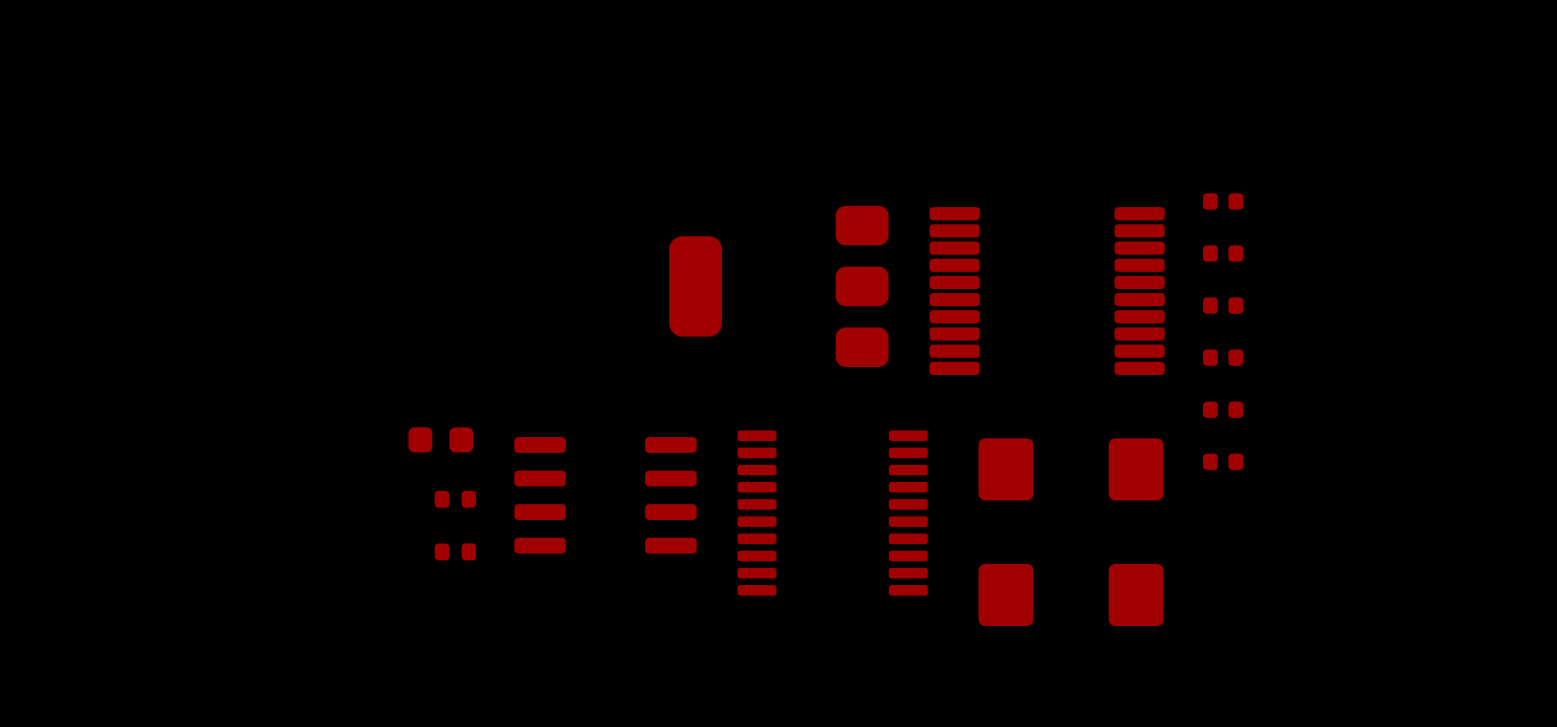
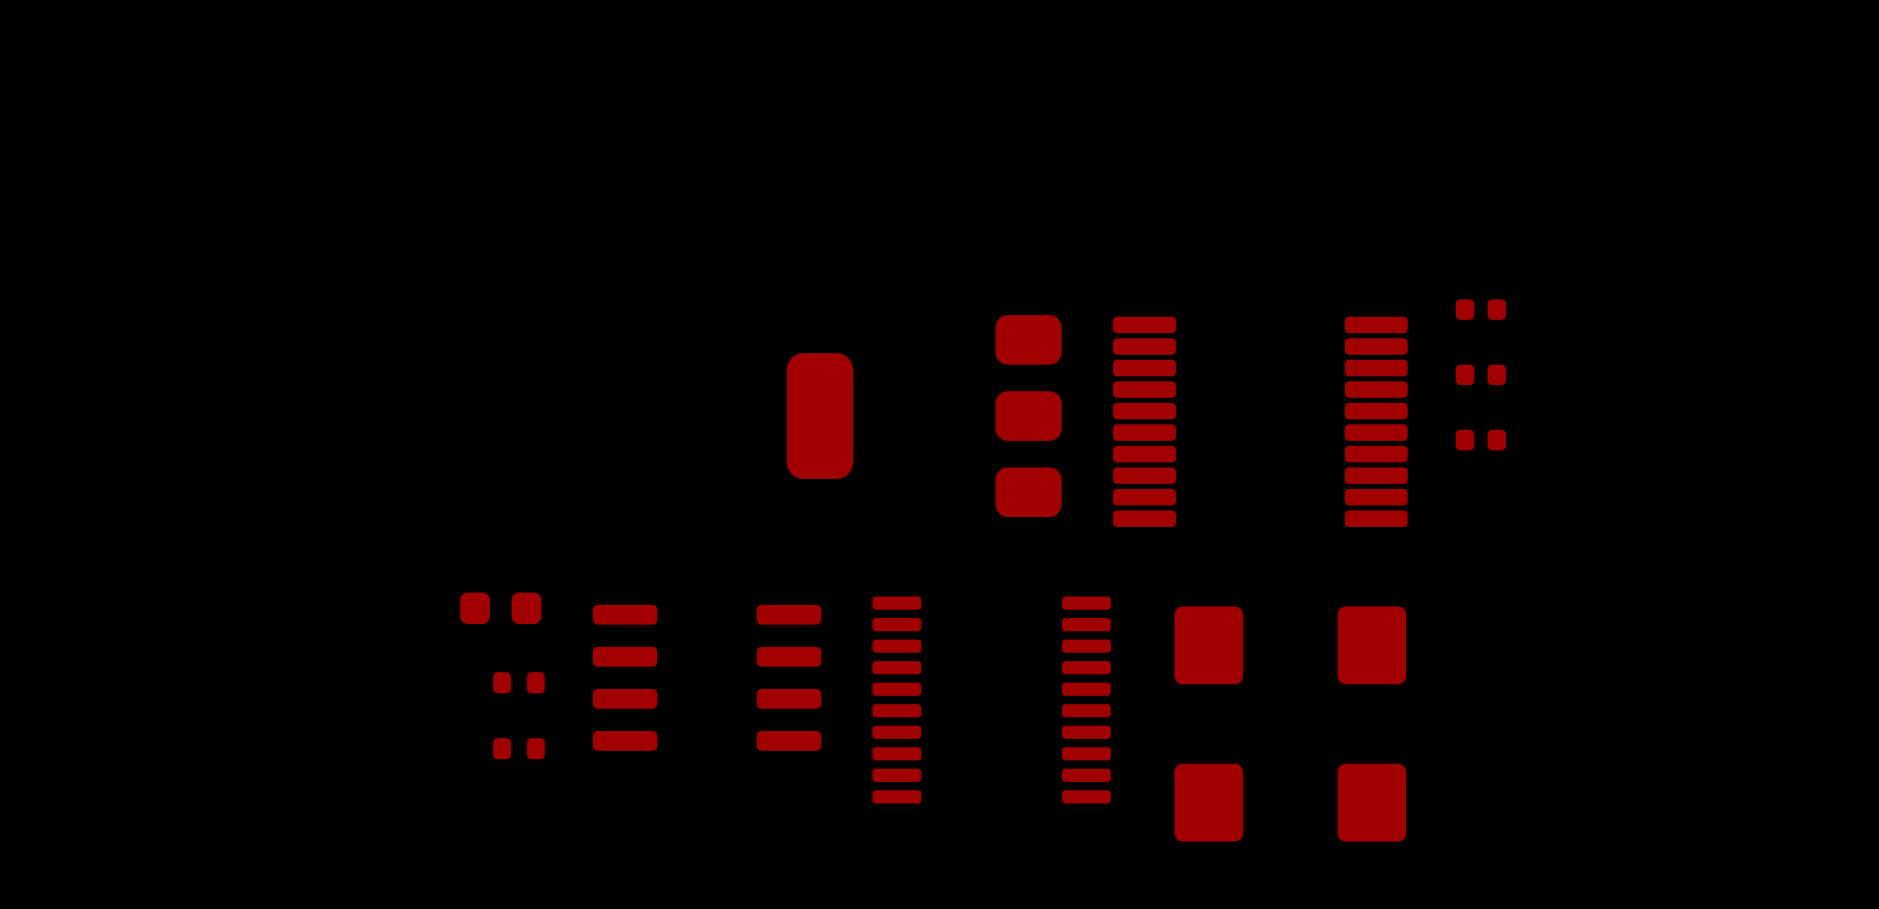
part: (1223, 357) -> none
part: (1223, 409) -> none
part: (1223, 461) -> none

